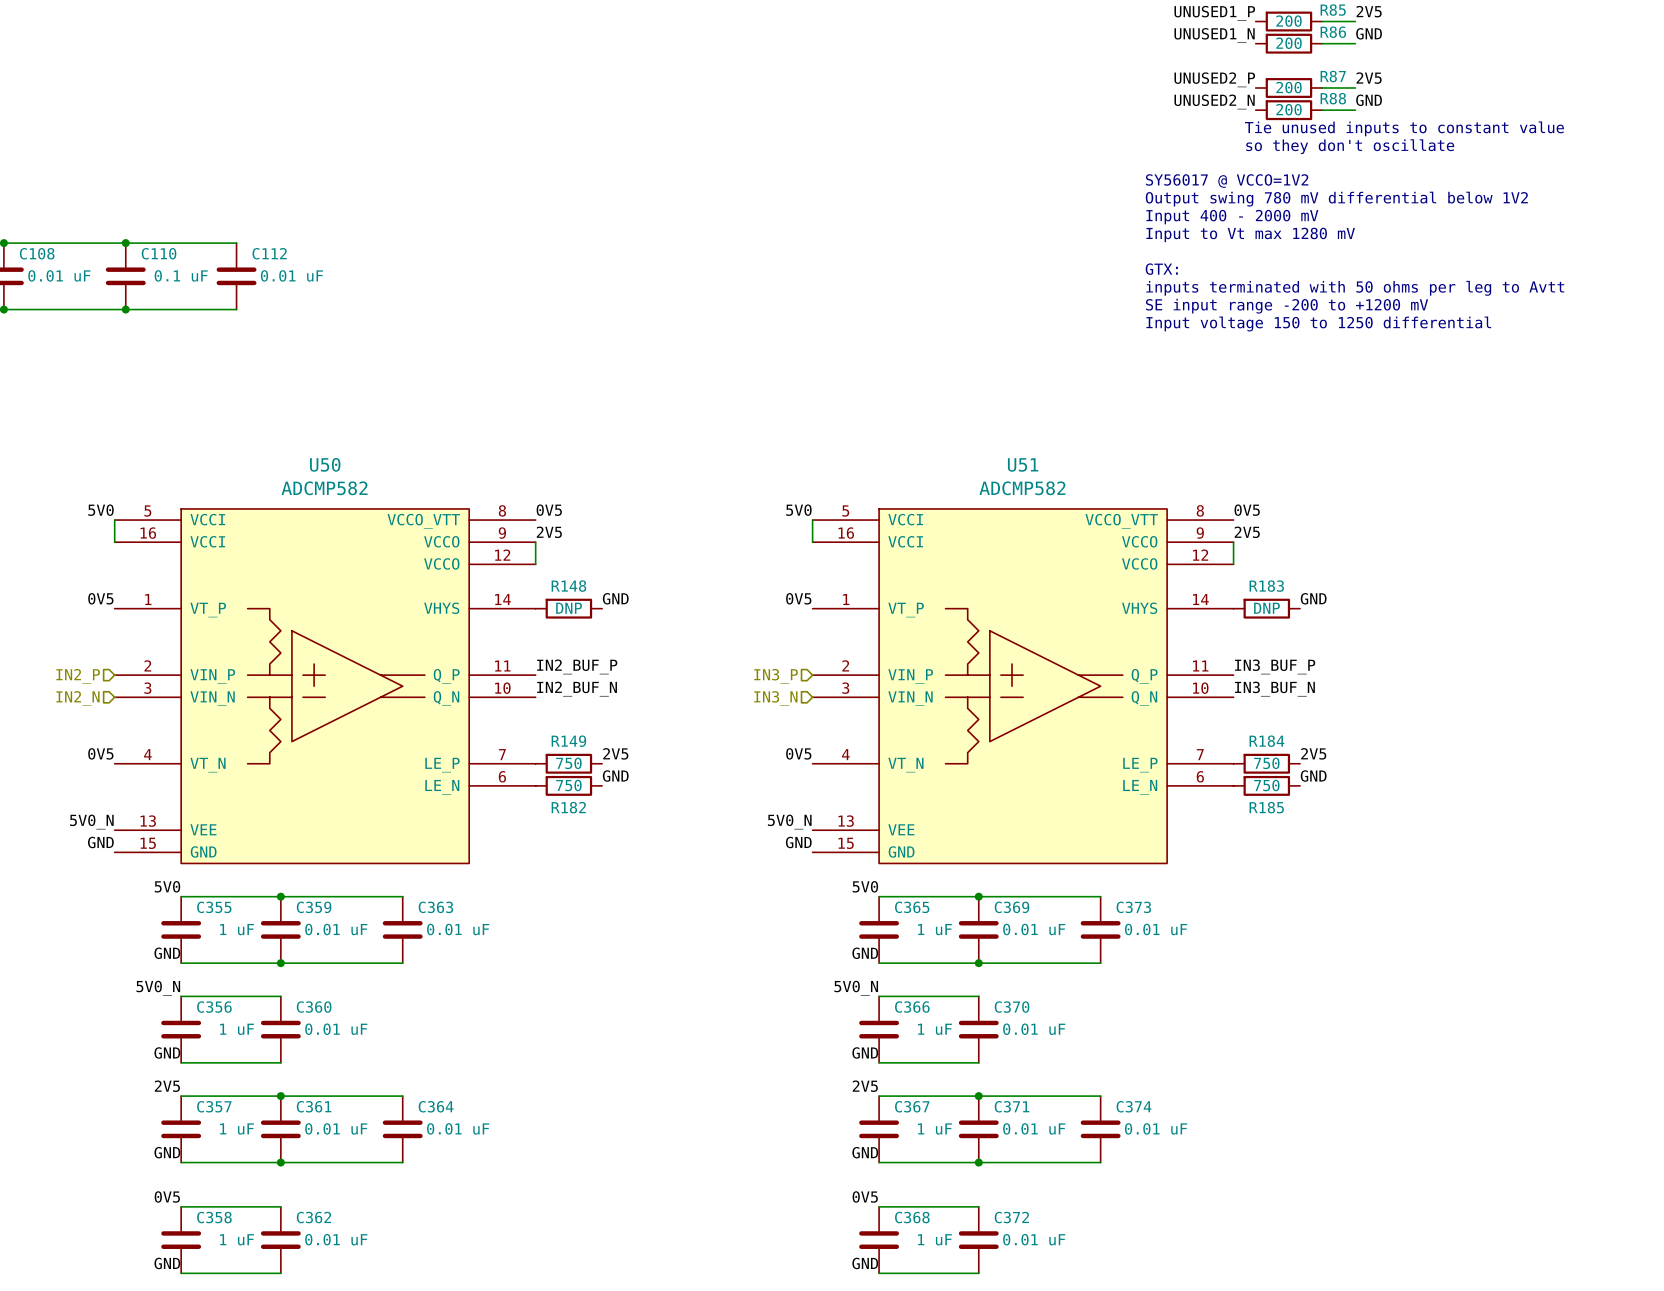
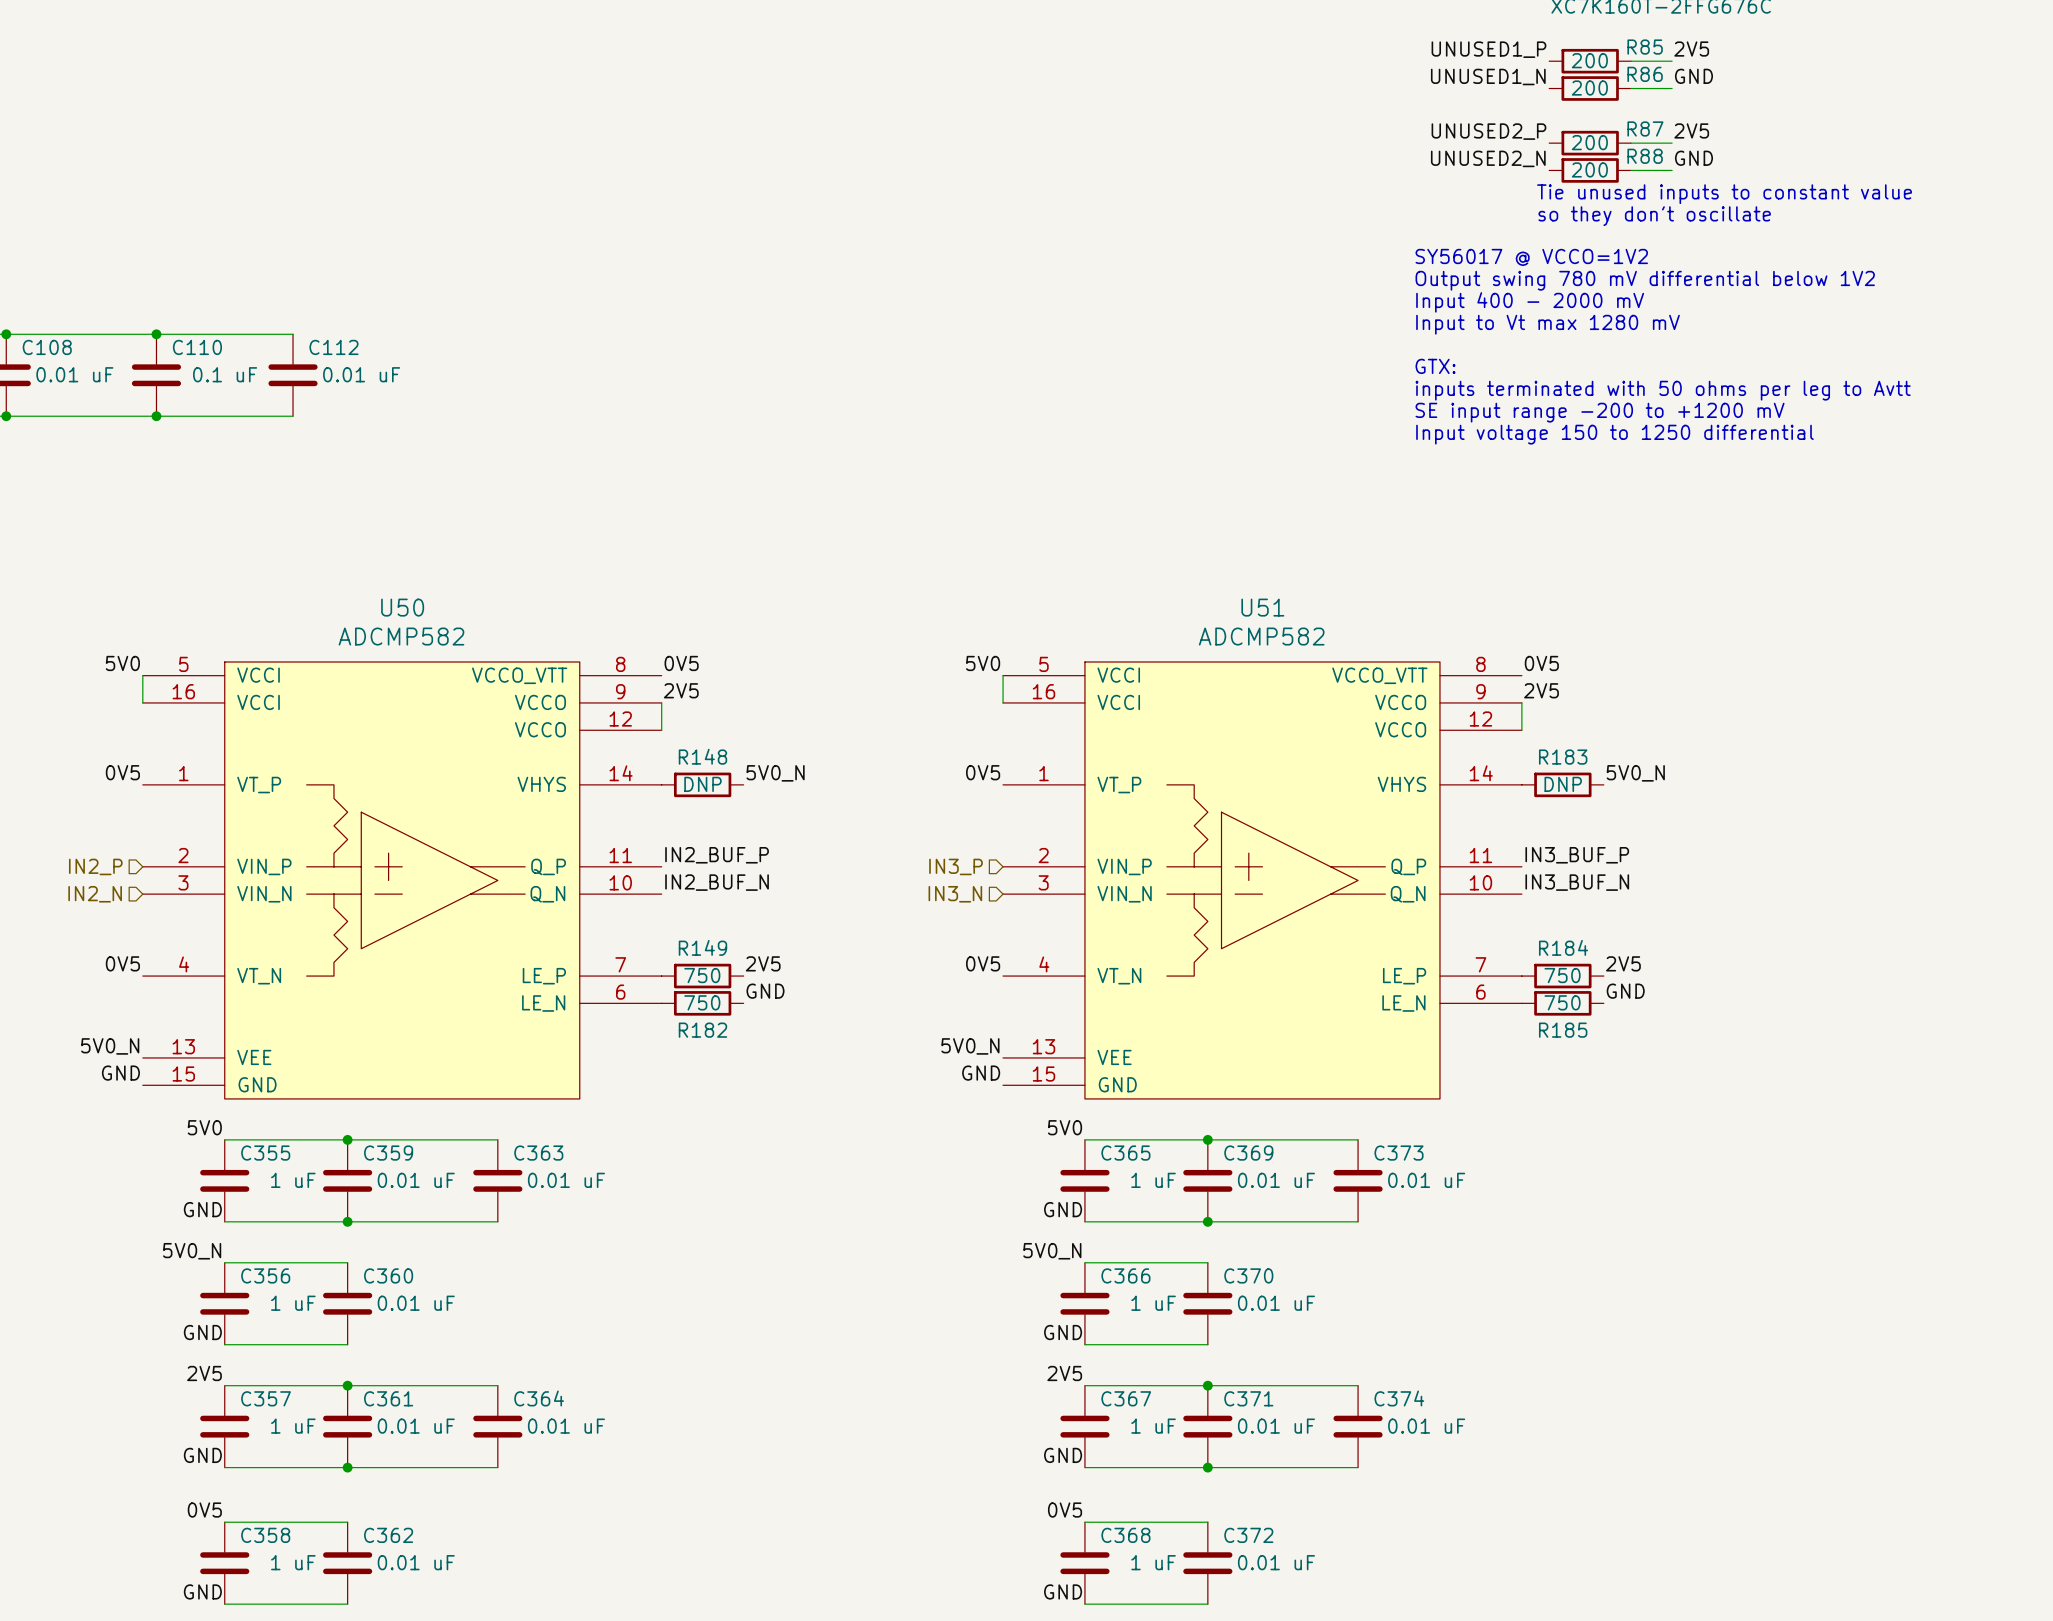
label: GND (615, 598) -> 5V0_N (775, 773)
label: GND (1313, 598) -> 5V0_N (1635, 773)

